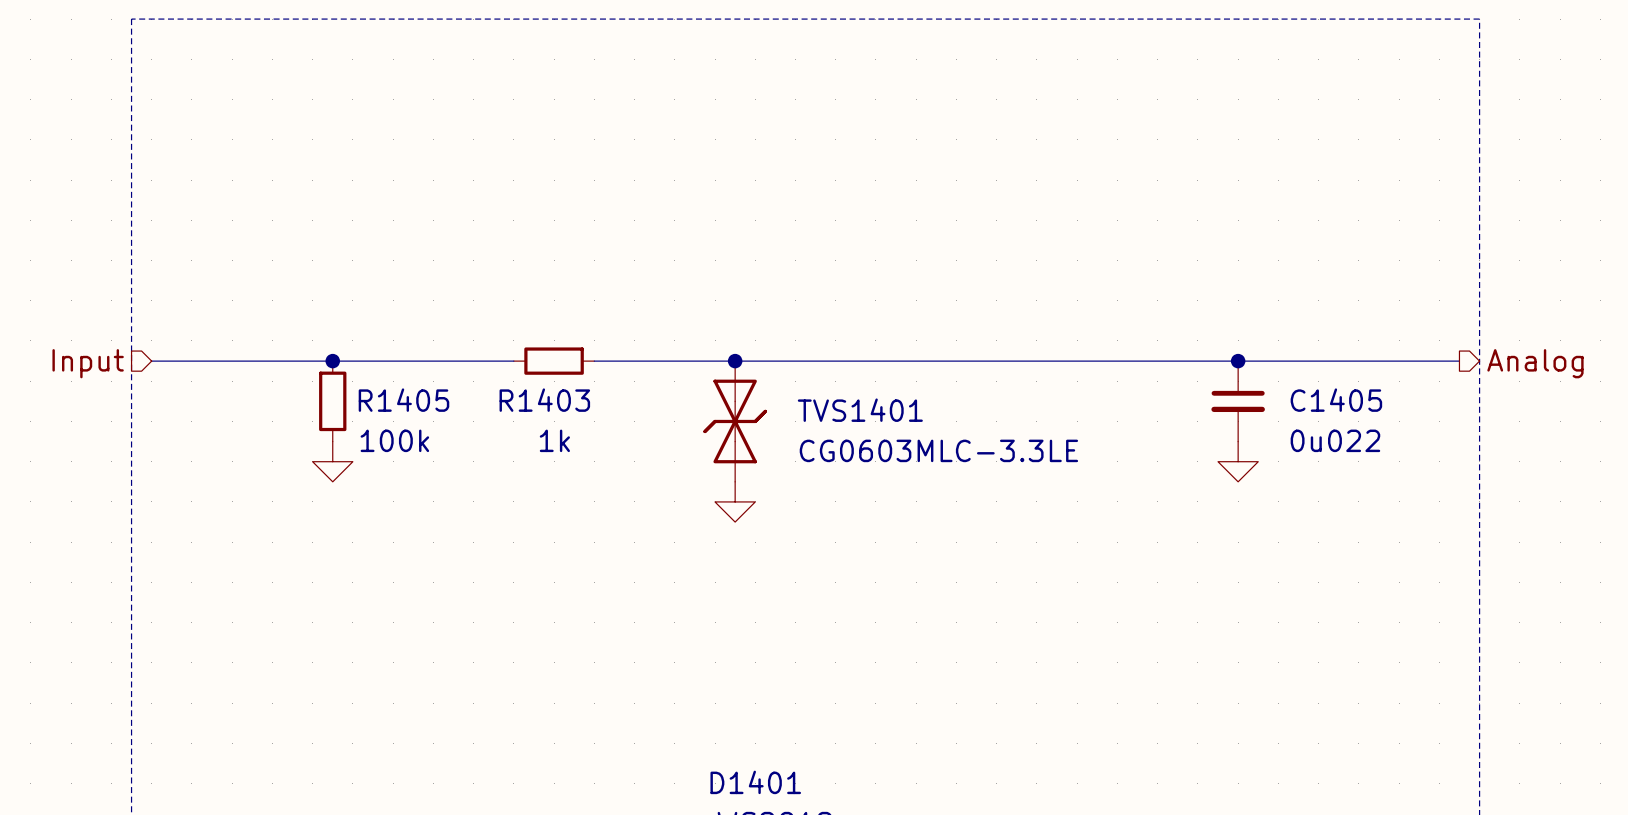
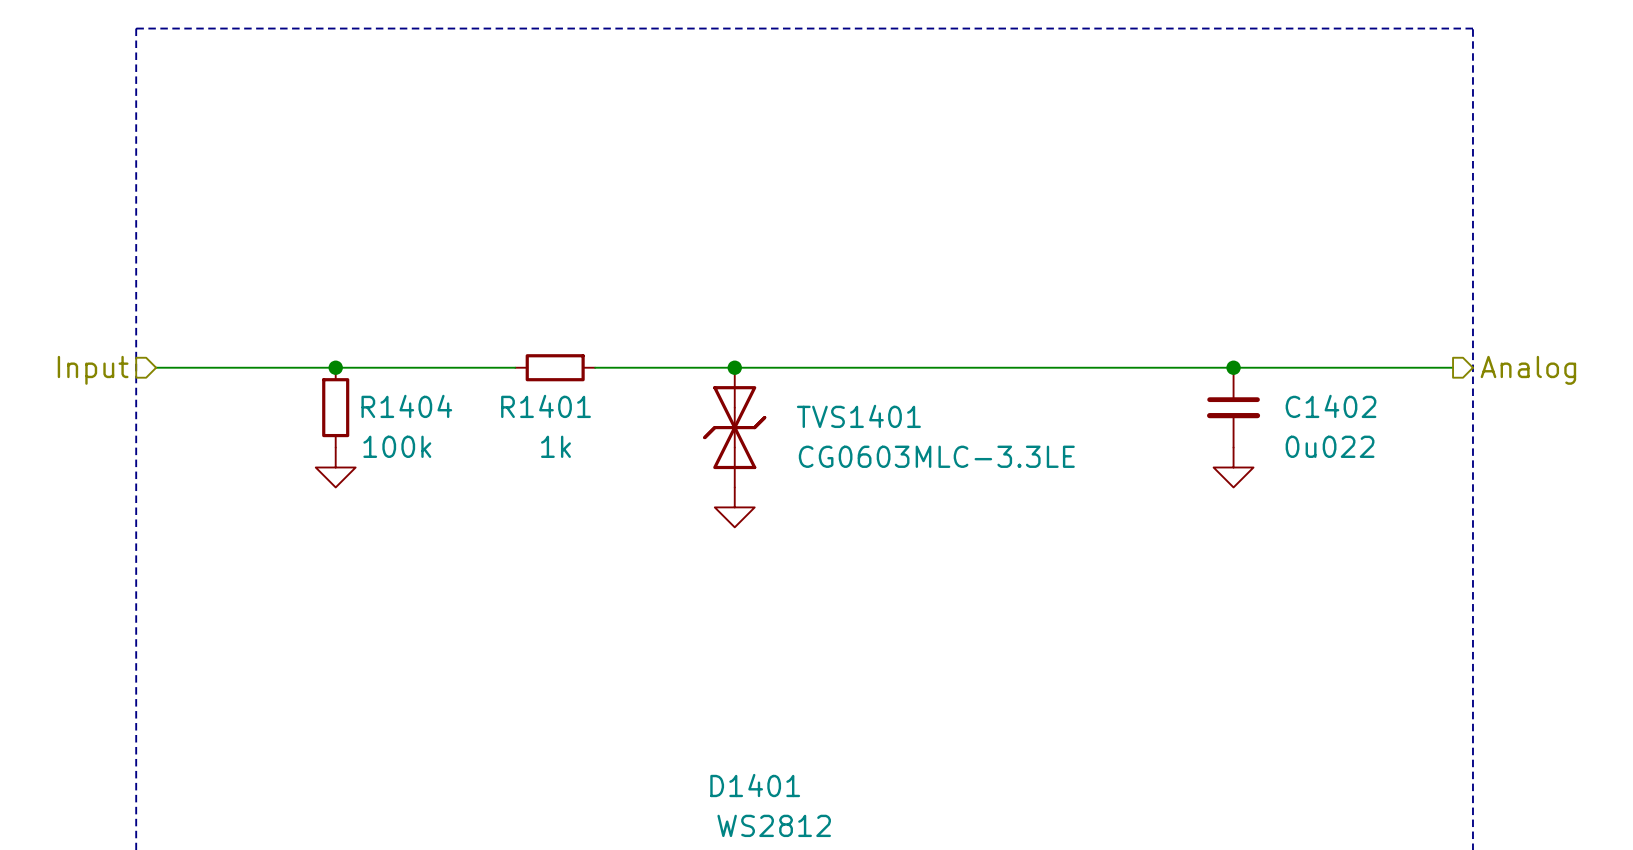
R1405 name: R1405 (403, 400) -> R1404 (406, 406)
R1403 name: R1403 (544, 400) -> R1401 (546, 406)
C1405 name: C1405 (1336, 400) -> C1402 (1331, 406)

